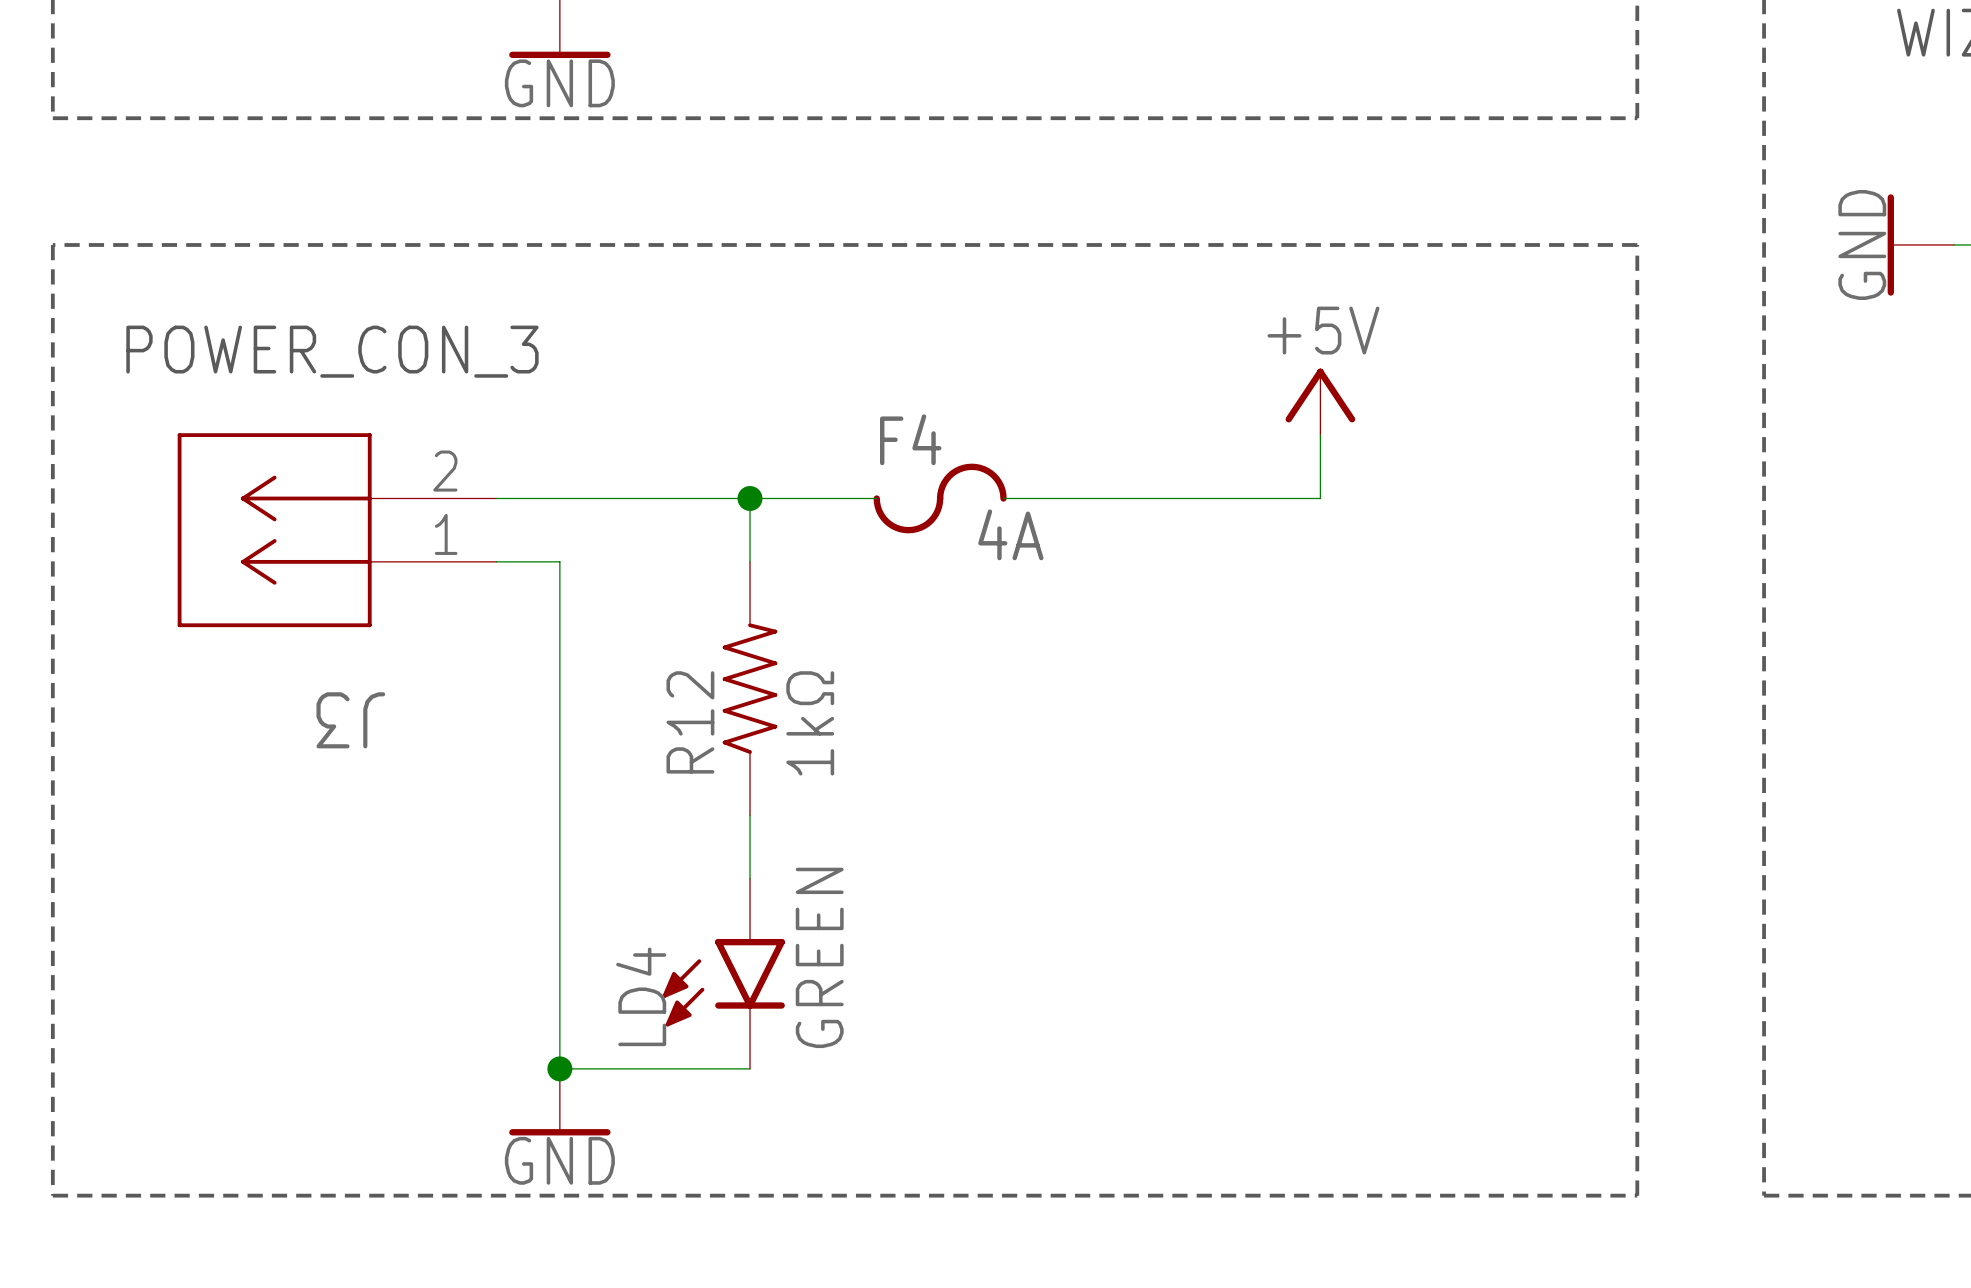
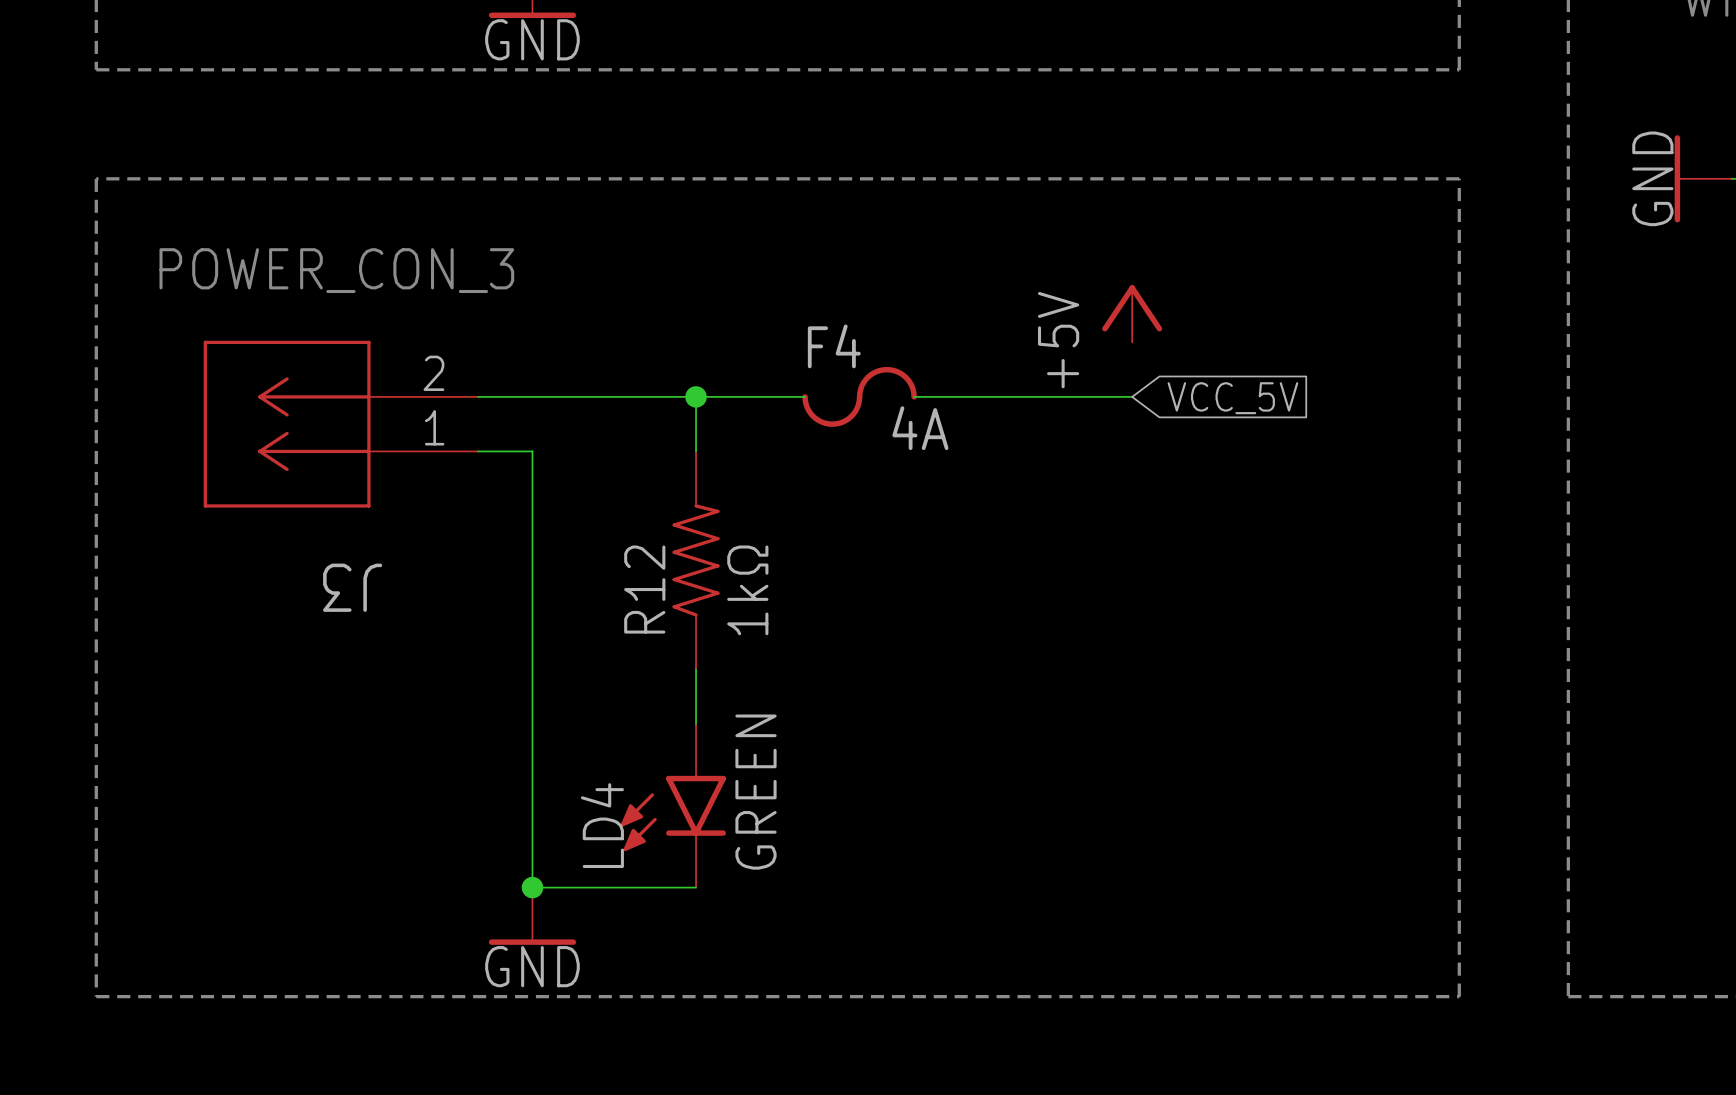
power symbol text rotation: 0° (1323, 330) -> 90° counterclockwise (1058, 340)
power symbol position: +5V (1320, 401) -> +5V (1132, 313)
wire: (1320, 435) (1320, 498) (1257, 498) -> none
global label: none -> VCC_5V (1232, 398)

